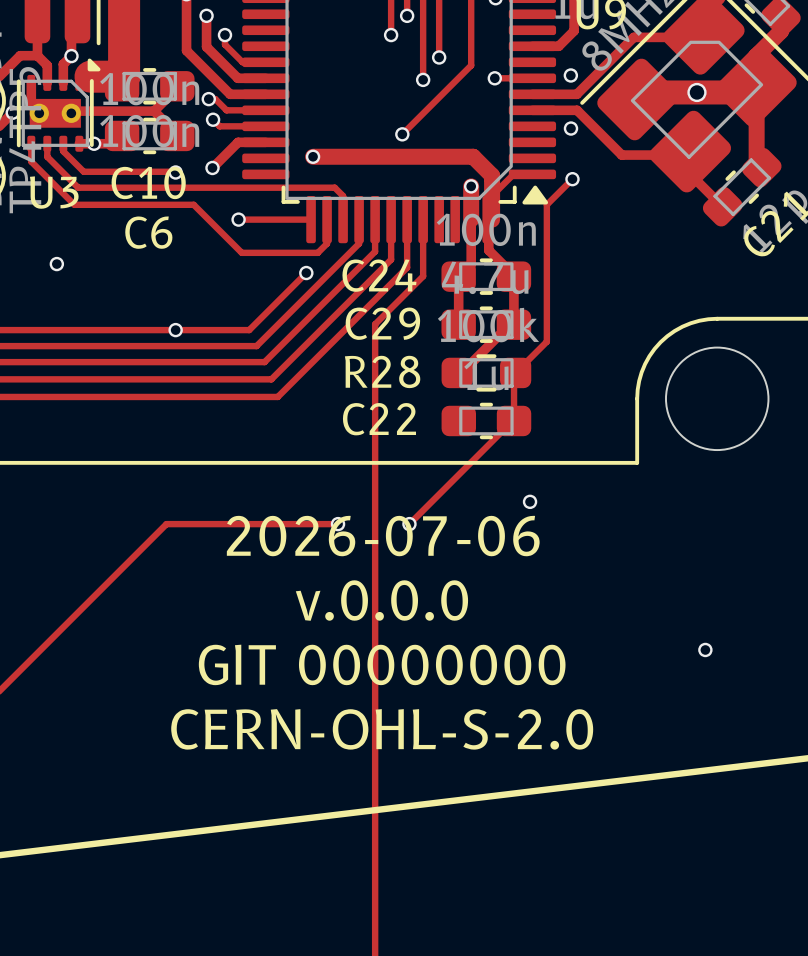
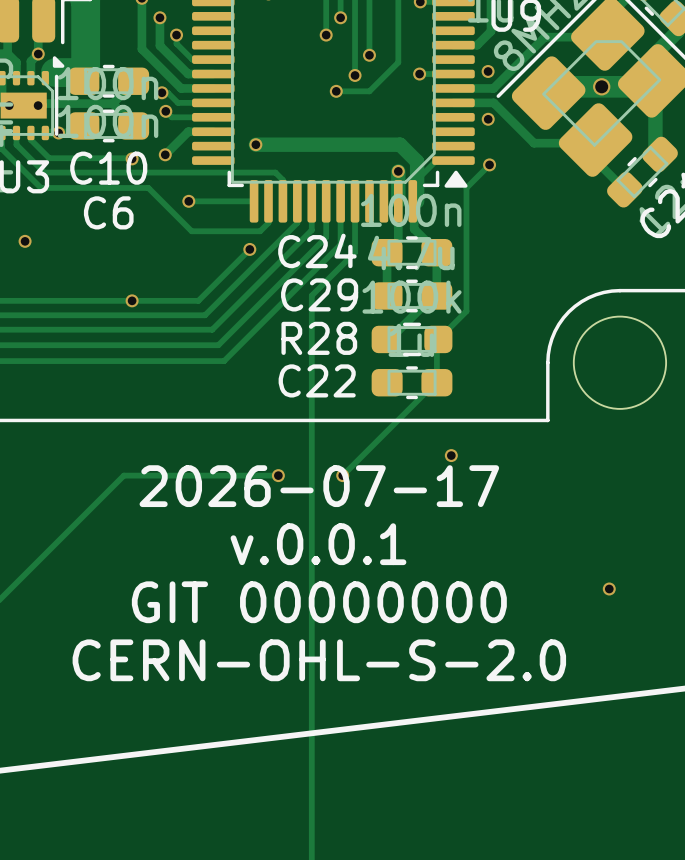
track: (439, 97) (402, 134) -> (369, 91) (336, 91)
via position: (402, 134) -> (336, 91)
text: 2026-07-06 (383, 536) -> 2026-07-17 (319, 486)
text: v.0.0.0 (381, 600) -> v.0.0.1 (318, 544)

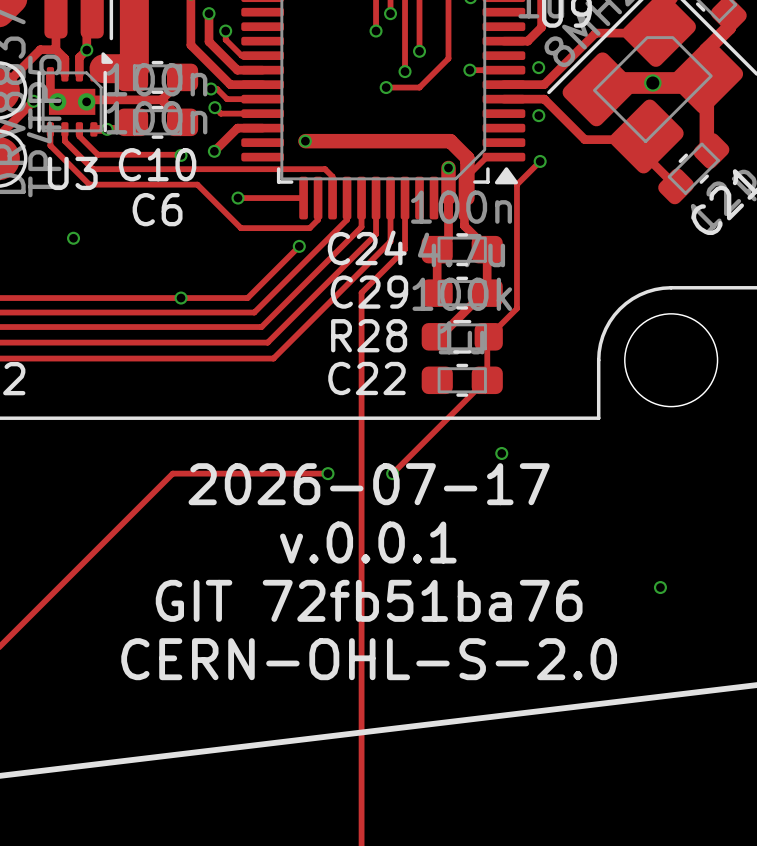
text: GIT 00000000 (319, 602) -> GIT 72fb51ba76 (369, 600)

